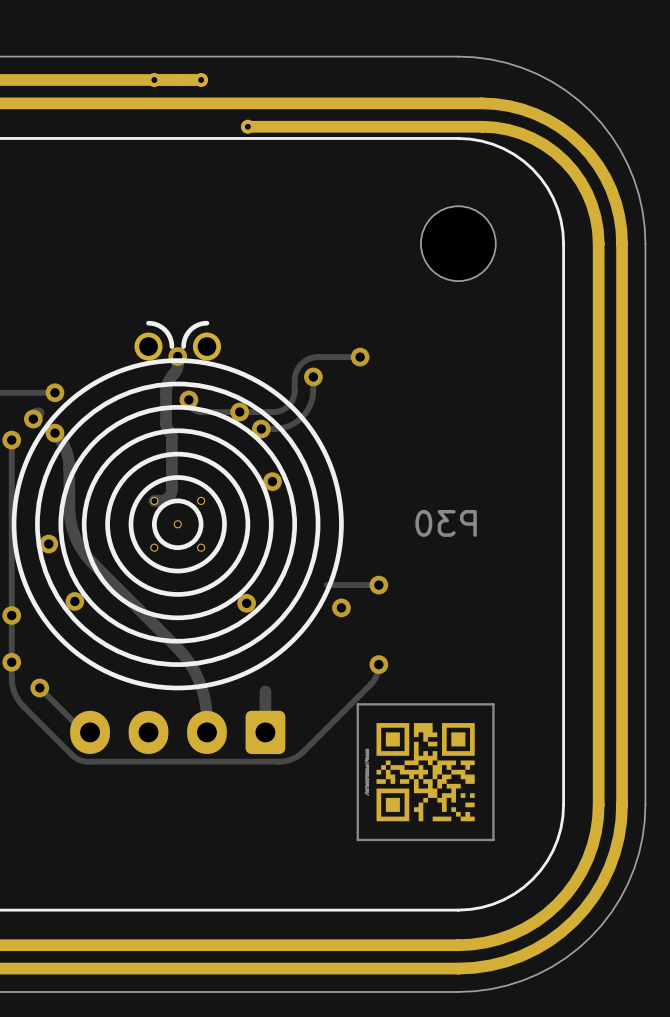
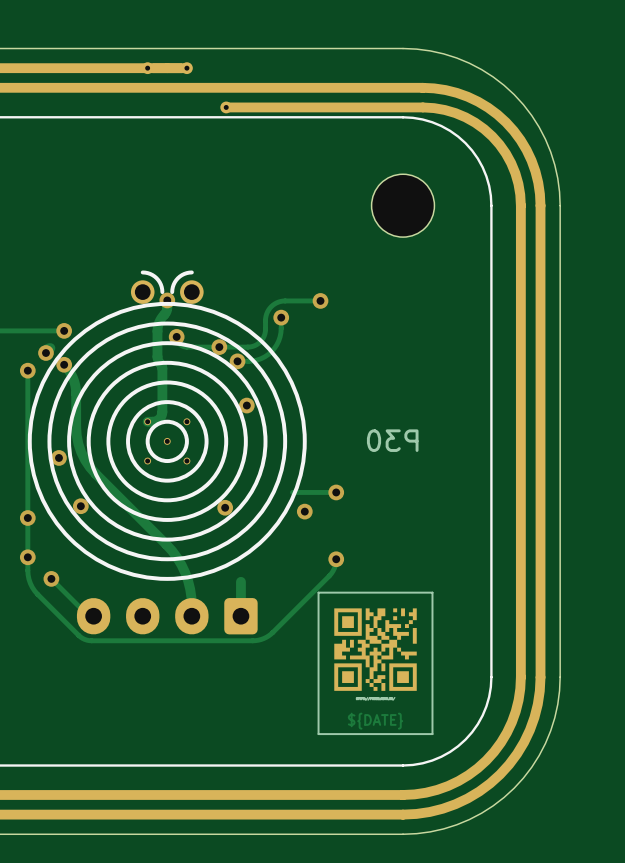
part footprint: [356, 703, 495, 842] -> [317, 591, 434, 736]

